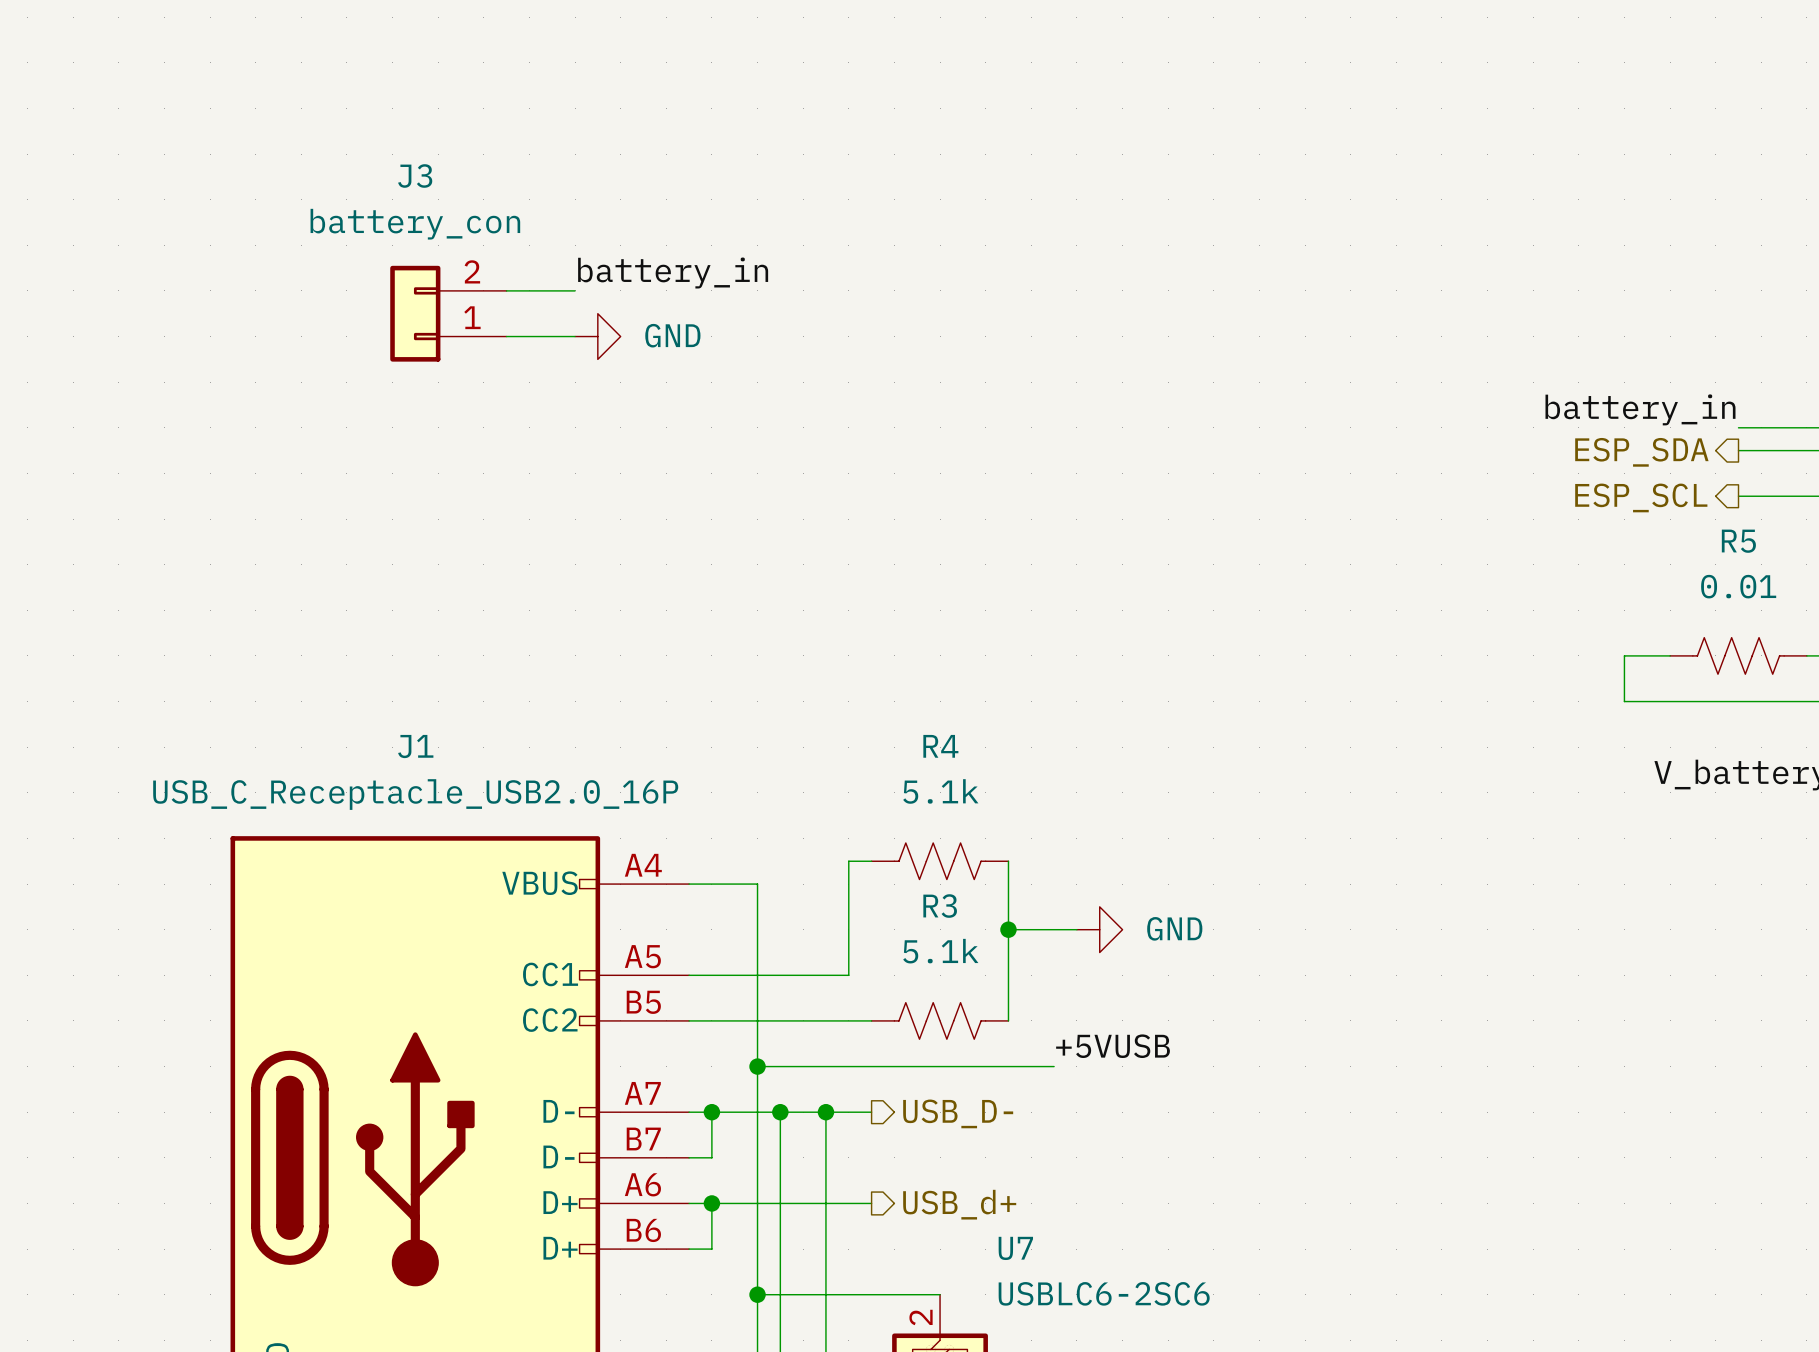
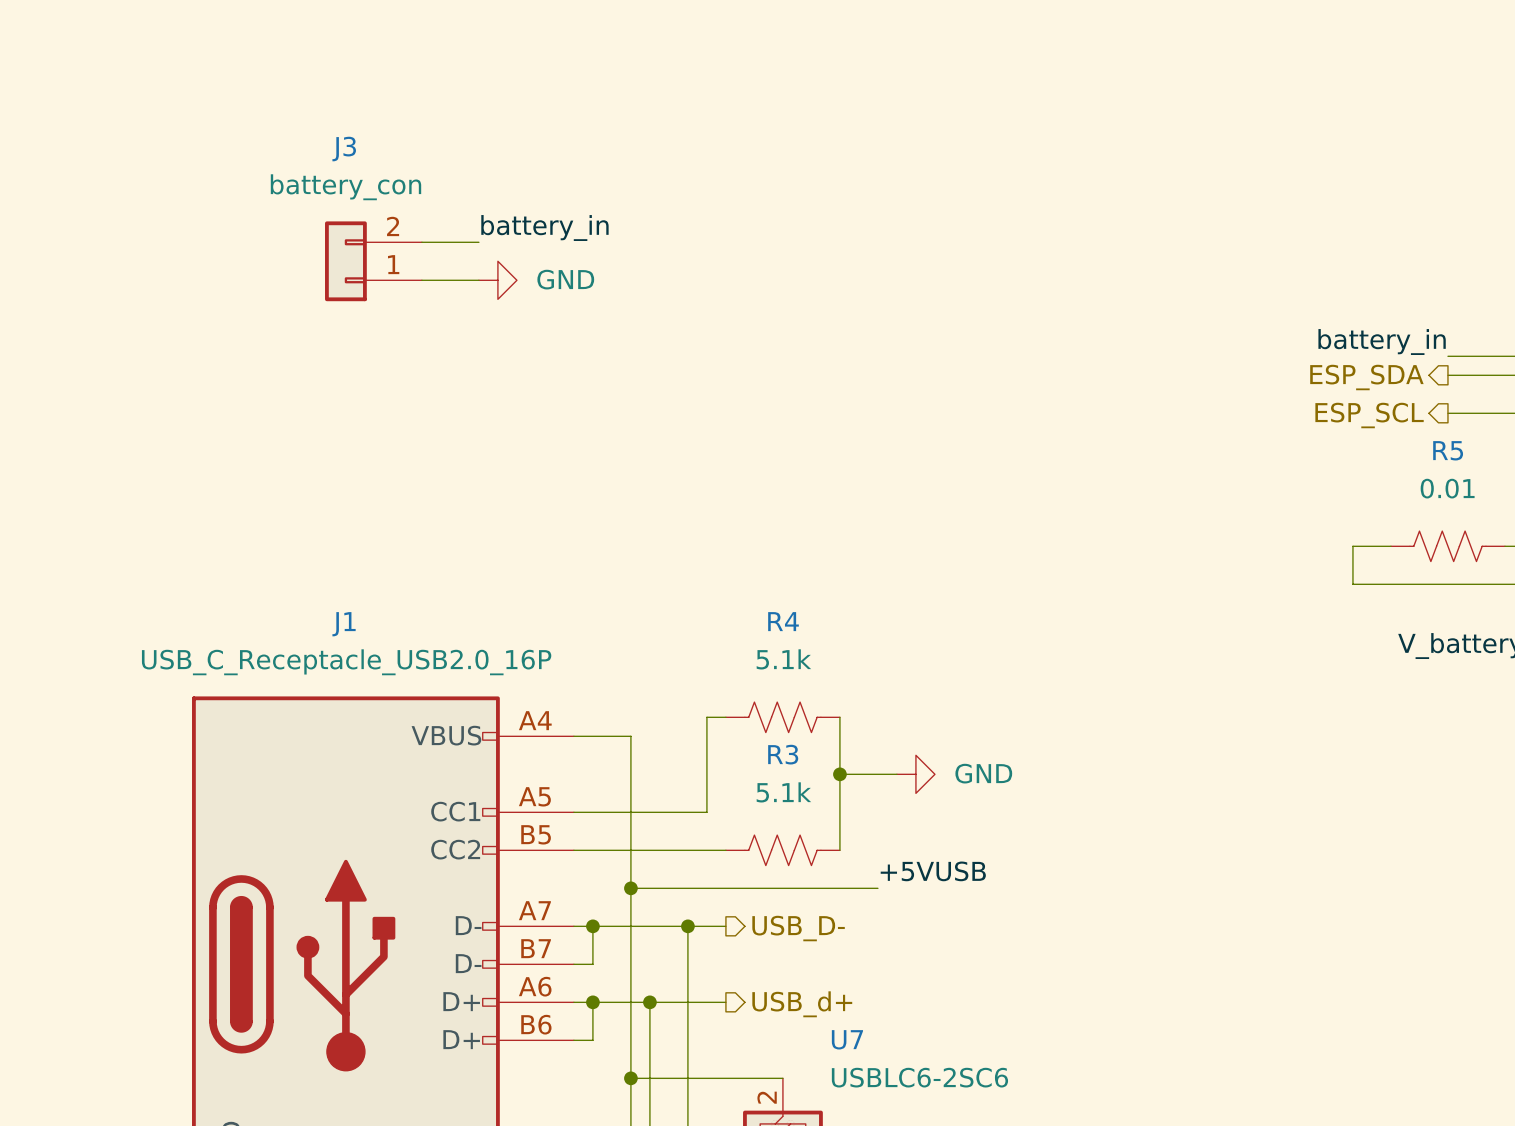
wire: (780, 1112) (780, 1203) -> none
junction position: (780, 1112) -> (649, 1002)

